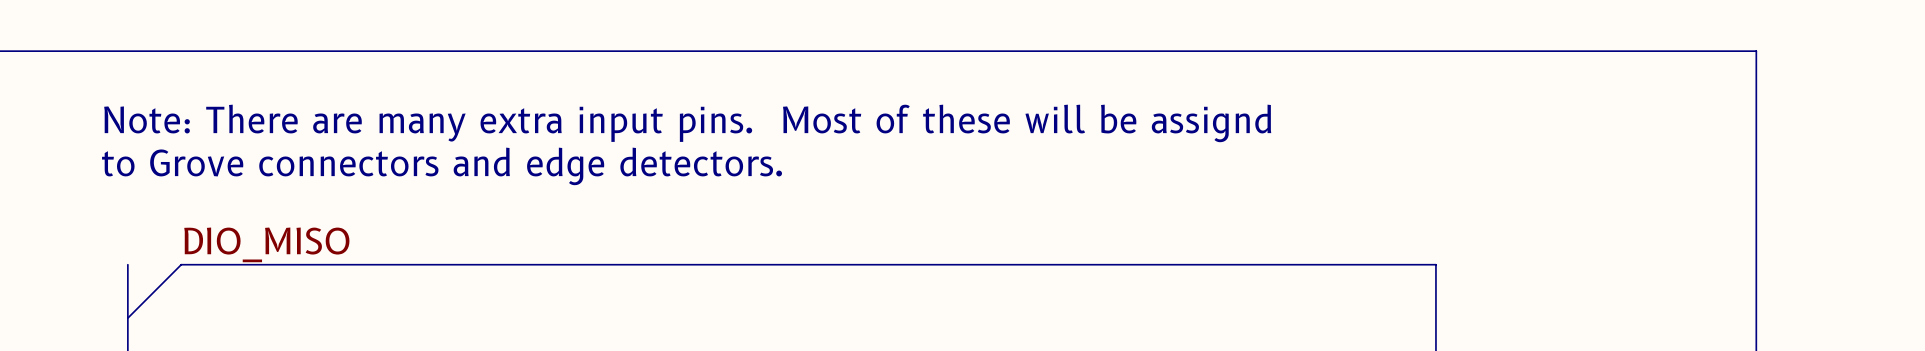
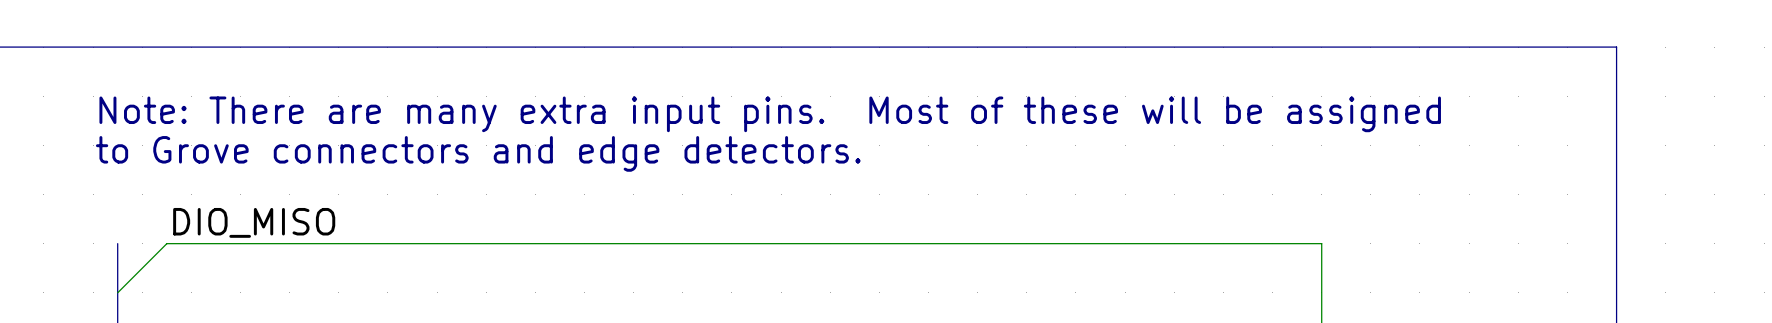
text: Note: There are many extra input pins. Most of these will be assignd (687, 123) -> Note: There are many extra input pins. Most of these will be assigned (770, 114)

